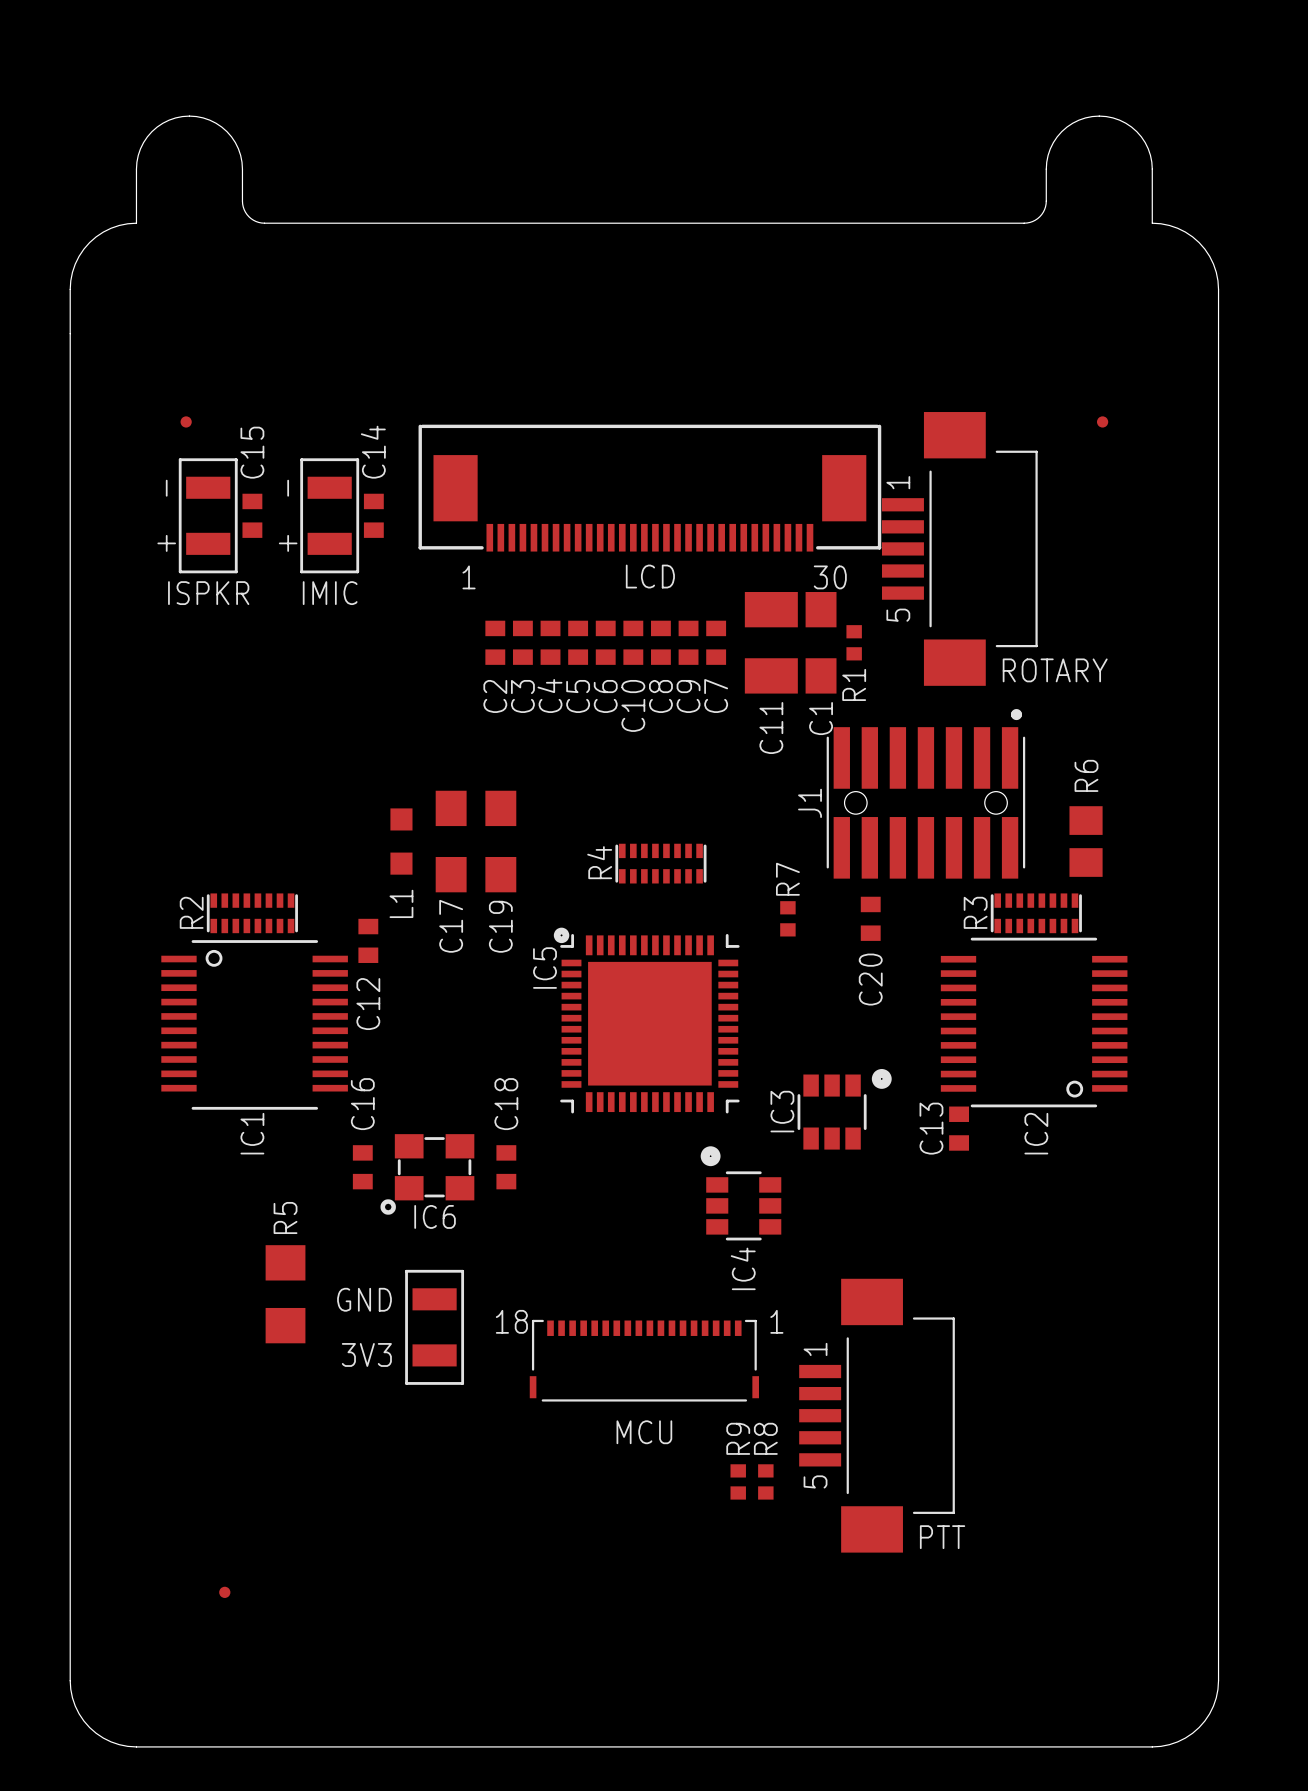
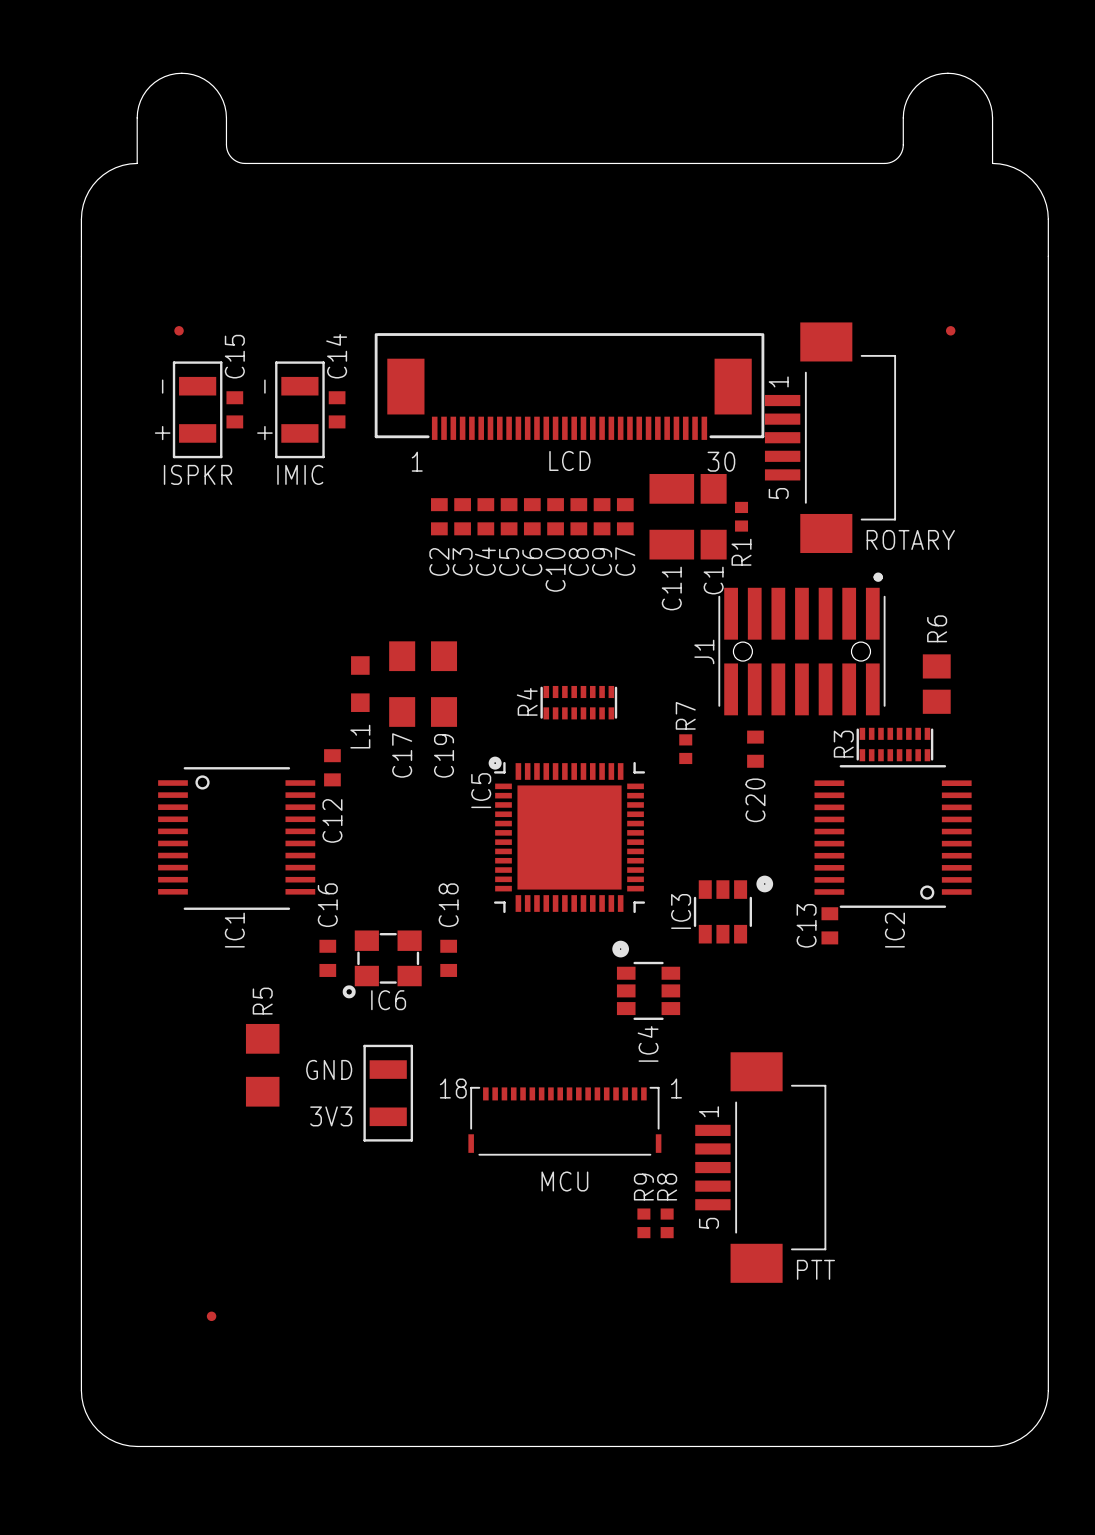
R2: (252, 913) -> none

